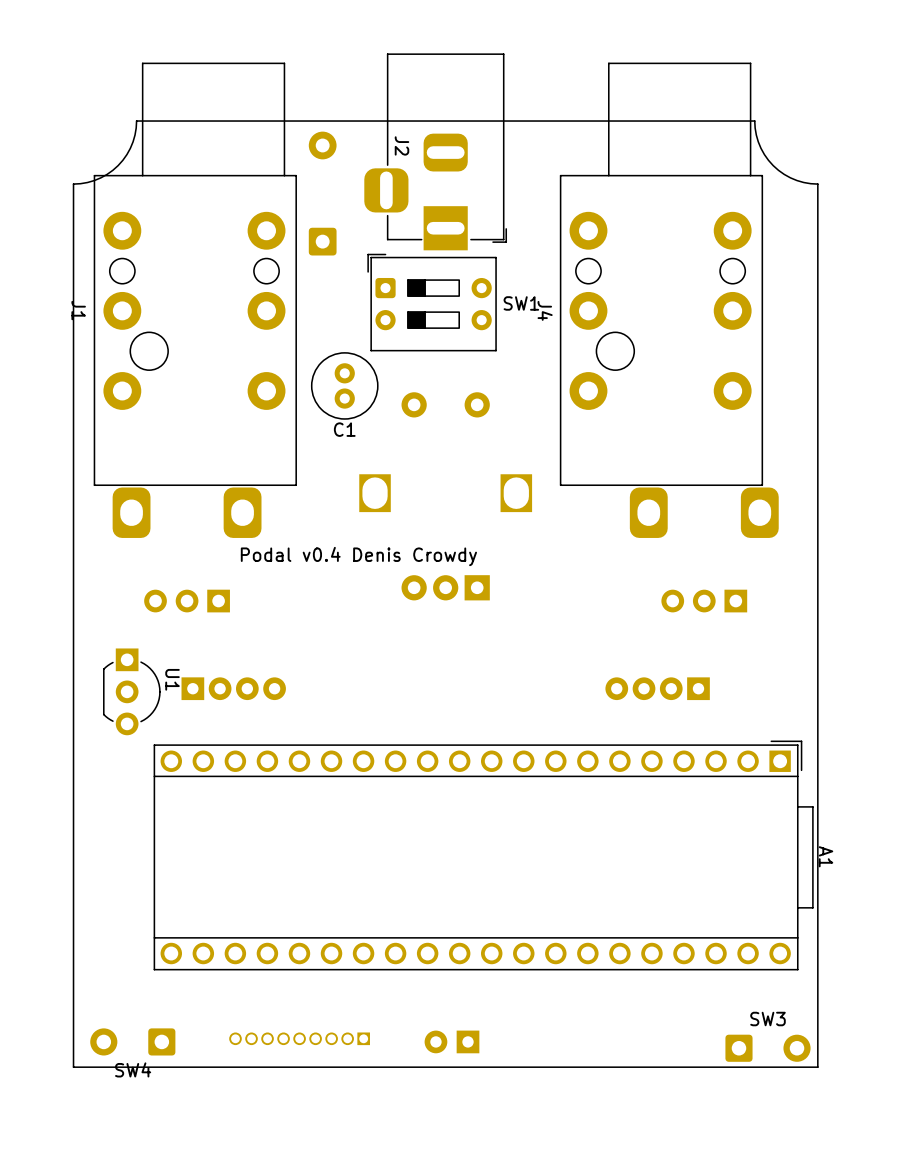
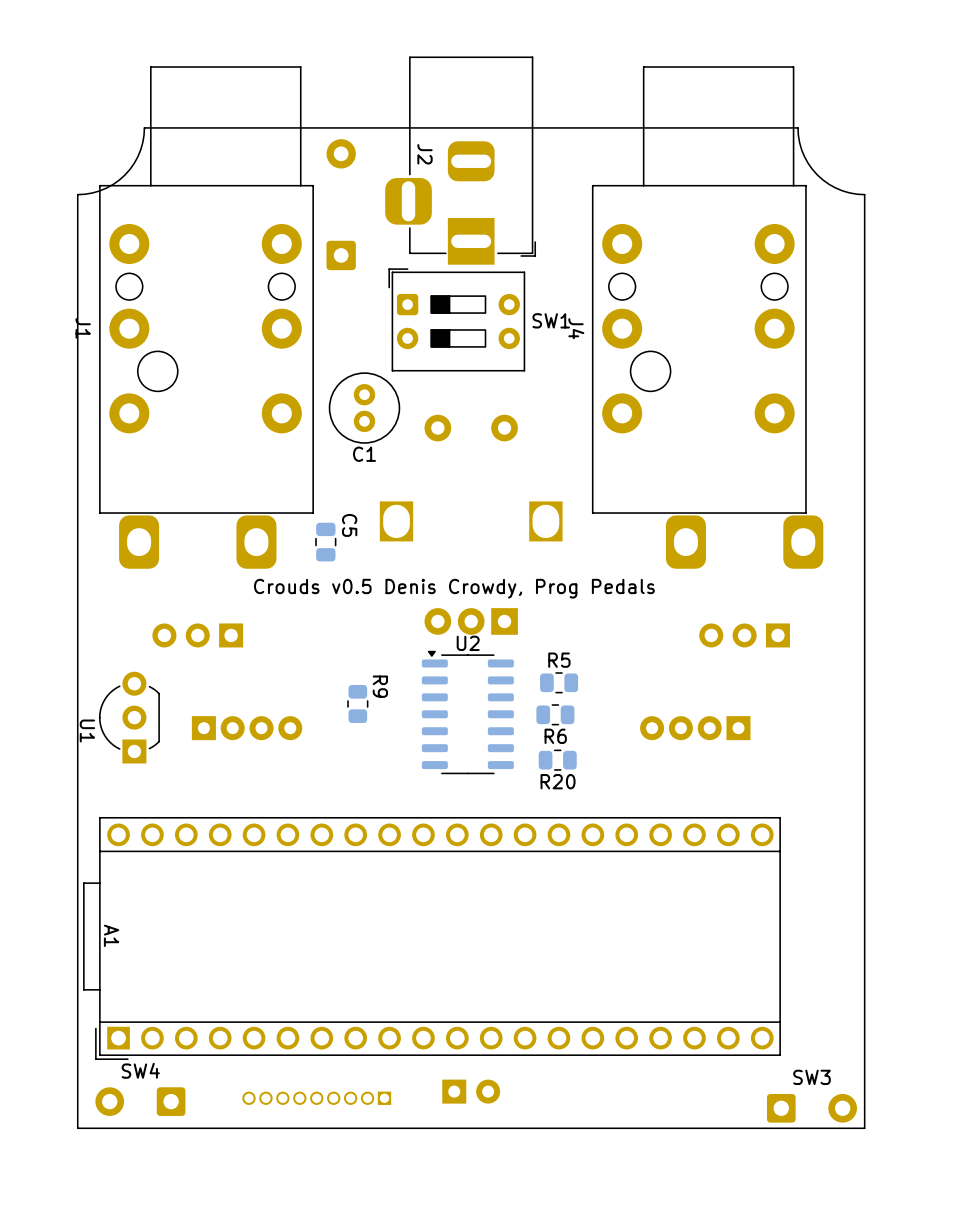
C5: none -> (325, 542)
text: Podal v0.4 Denis Crowdy (358, 556) -> Crouds v0.5 Denis Crowdy, Prog Pedals (454, 588)
R5: none -> (559, 682)
R9: none -> (357, 703)
U2: none -> (467, 712)
R6: none -> (555, 714)
U1 rotation: 0° (131, 691) -> 180° (129, 717)
R20: none -> (557, 760)
A1 rotation: 0° (483, 855) -> 180° (431, 938)
A1 name position: A1 (826, 856) -> A1 (111, 935)
part rotation: 0° (451, 1041) -> 180° (471, 1091)
SW4 name position: SW4 (133, 1069) -> SW4 (140, 1070)

